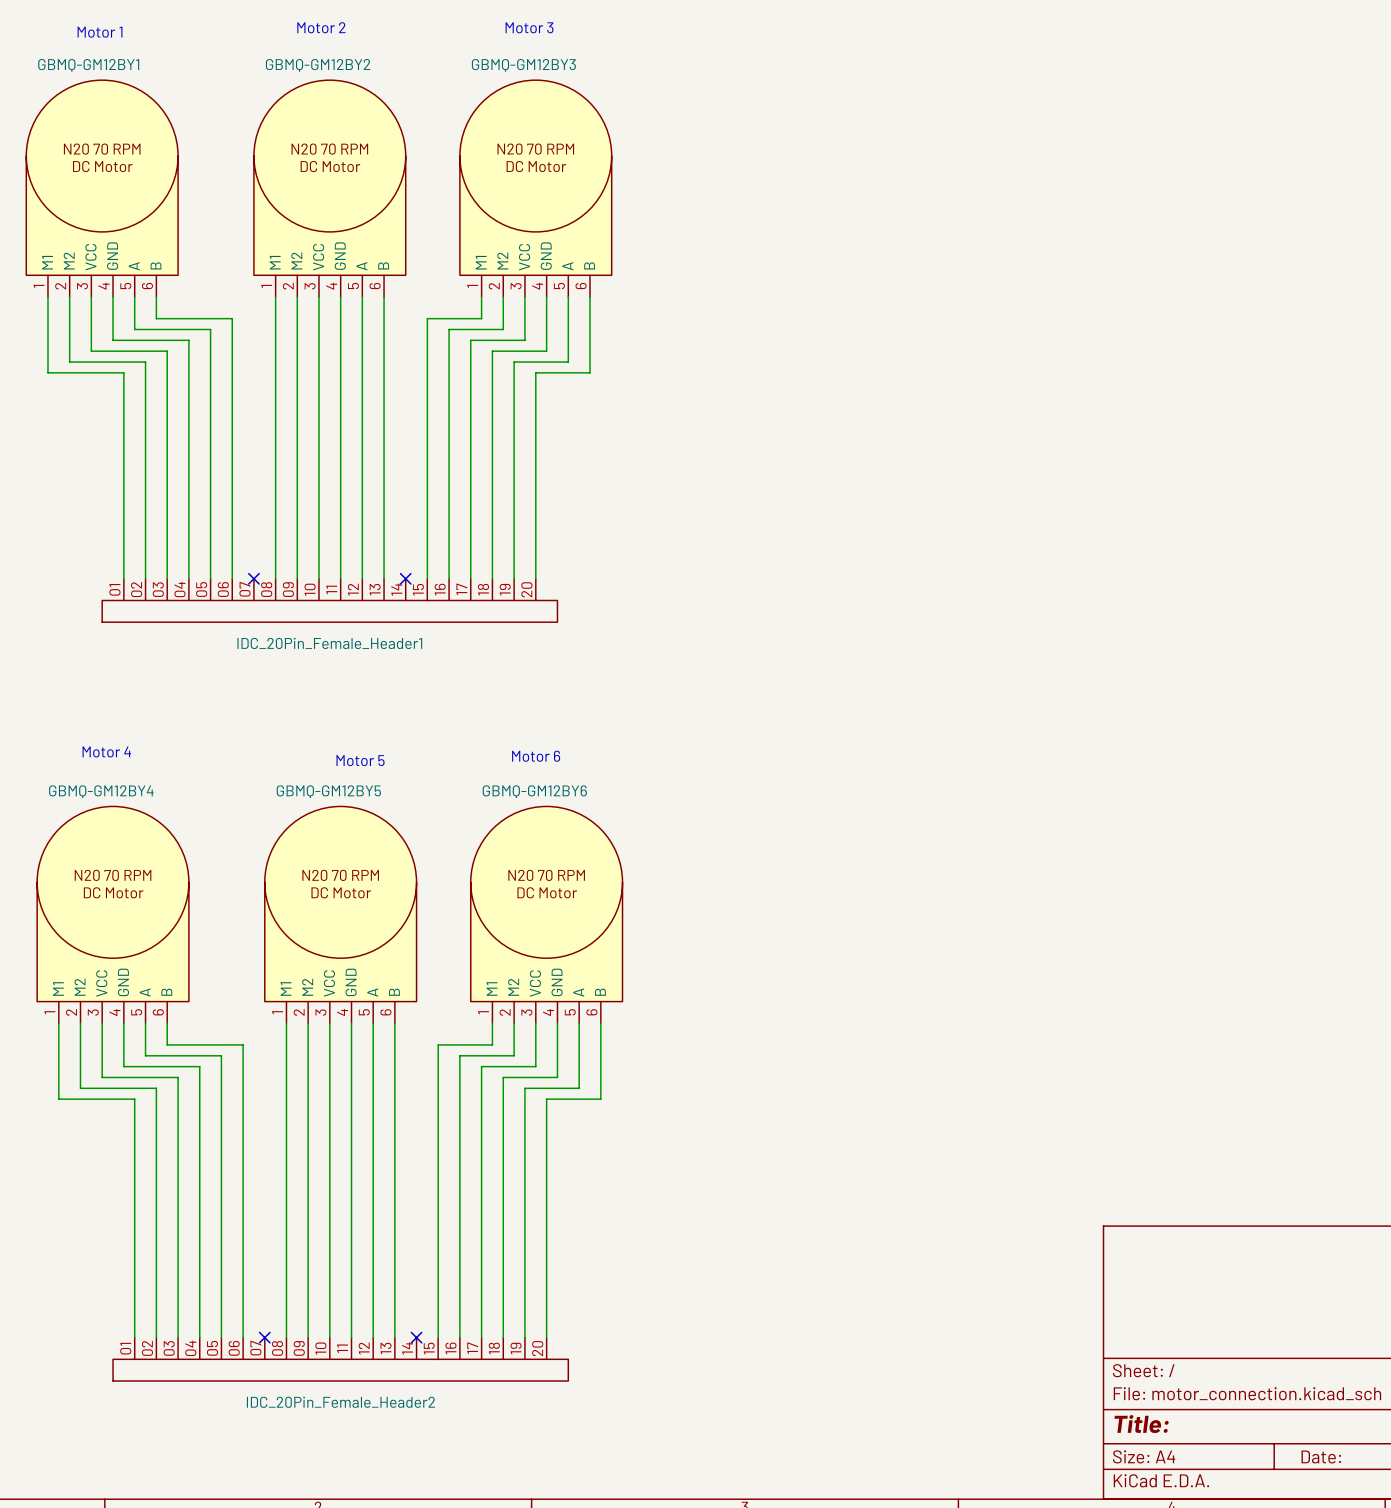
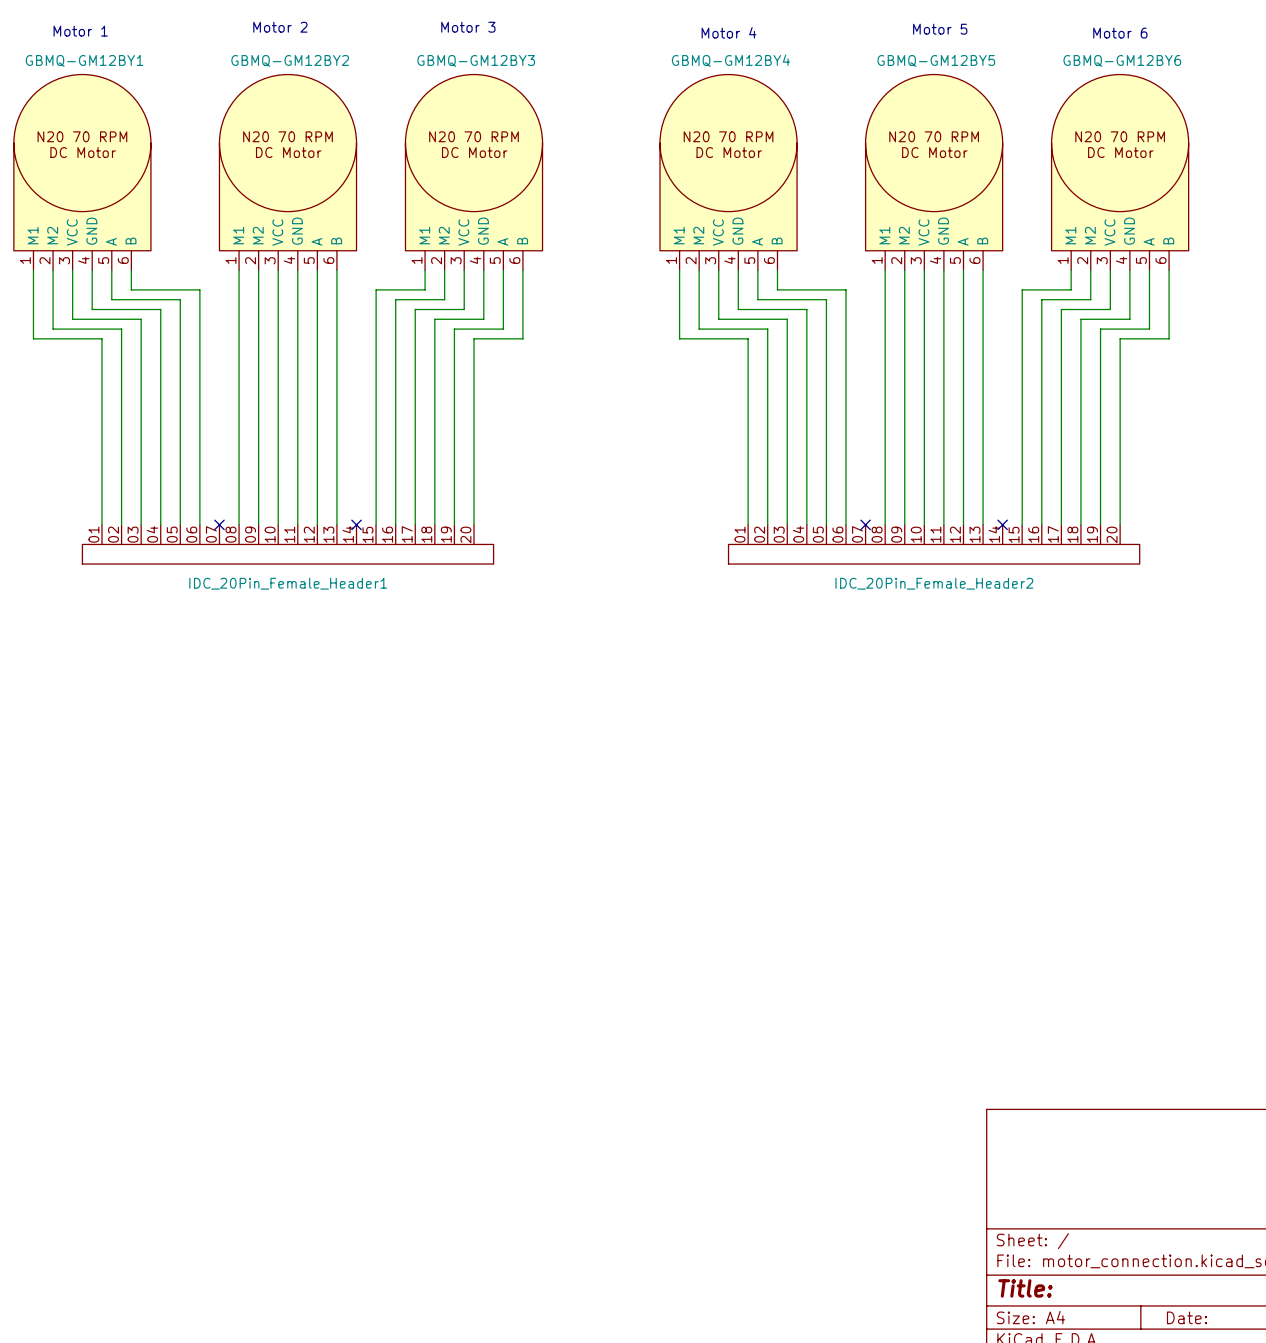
text: none -> Motor 5 (940, 29)
text: none -> Motor 4 (729, 32)
text: none -> Motor 6 (1120, 33)
wire: none -> (679, 270) (679, 338) (748, 338) (748, 524)
wire: none -> (699, 270) (699, 329) (767, 329) (767, 524)
wire: none -> (718, 270) (718, 319) (787, 319) (787, 524)
wire: none -> (738, 270) (738, 309) (806, 309) (806, 524)
wire: none -> (757, 270) (757, 299) (826, 299) (826, 524)
wire: none -> (777, 270) (777, 289) (846, 289) (846, 524)
wire: none -> (885, 270) (885, 524)
wire: none -> (904, 270) (904, 524)
wire: none -> (924, 270) (924, 524)
wire: none -> (943, 270) (943, 524)
wire: none -> (963, 270) (963, 524)
wire: none -> (983, 270) (983, 524)
wire: none -> (1071, 270) (1071, 289) (1022, 289) (1022, 524)
wire: none -> (1090, 270) (1090, 299) (1041, 299) (1041, 524)
wire: none -> (1110, 270) (1110, 309) (1061, 309) (1061, 524)
wire: none -> (1129, 270) (1129, 319) (1080, 319) (1080, 524)
wire: none -> (1149, 270) (1149, 329) (1100, 329) (1100, 524)
wire: none -> (1169, 270) (1169, 338) (1120, 338) (1120, 524)
no-connect mark: none -> (865, 524)
no-connect mark: none -> (1002, 524)
text: Motor 4 (106, 751) -> none
text: Motor 6 (536, 756) -> none
text: Motor 5 (360, 760) -> none
GBMQ-GM12BY4 position: (113, 914) -> (728, 172)
GBMQ-GM12BY5 position: (340, 914) -> (934, 172)
GBMQ-GM12BY6 position: (546, 914) -> (1120, 172)
wire: (58, 1023) (58, 1099) (134, 1099) (134, 1337) -> none
wire: (80, 1023) (80, 1088) (156, 1088) (156, 1337) -> none
wire: (102, 1023) (102, 1077) (178, 1077) (178, 1337) -> none
wire: (123, 1023) (123, 1066) (199, 1066) (199, 1337) -> none
wire: (145, 1023) (145, 1055) (221, 1055) (221, 1337) -> none
wire: (167, 1023) (167, 1044) (243, 1044) (243, 1337) -> none
wire: (286, 1023) (286, 1337) -> none
wire: (308, 1023) (308, 1337) -> none
wire: (329, 1023) (329, 1337) -> none
wire: (351, 1023) (351, 1337) -> none
wire: (373, 1023) (373, 1337) -> none
wire: (394, 1023) (394, 1337) -> none
wire: (492, 1023) (492, 1044) (438, 1044) (438, 1337) -> none
wire: (514, 1023) (514, 1055) (459, 1055) (459, 1337) -> none
wire: (535, 1023) (535, 1066) (481, 1066) (481, 1337) -> none
wire: (557, 1023) (557, 1077) (503, 1077) (503, 1337) -> none
wire: (579, 1023) (579, 1088) (524, 1088) (524, 1337) -> none
wire: (600, 1023) (600, 1099) (546, 1099) (546, 1337) -> none
no-connect mark: (264, 1337) -> none
no-connect mark: (416, 1337) -> none
IDC_20Pin_Female_Header2 position: (340, 1359) -> (934, 544)

